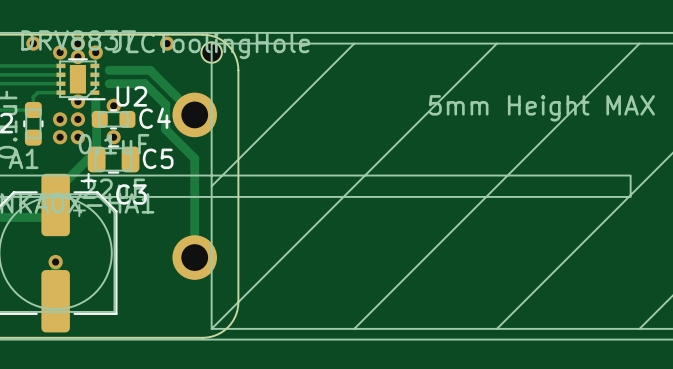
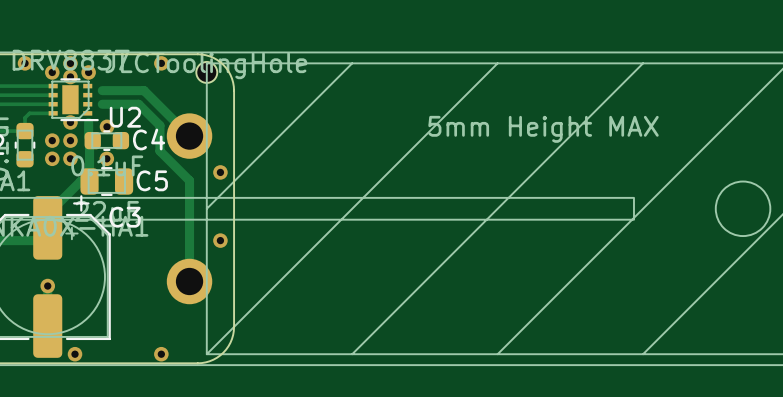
via: none -> (220, 172)
via: none -> (220, 240)
via: none -> (75, 354)
via: none -> (161, 354)

